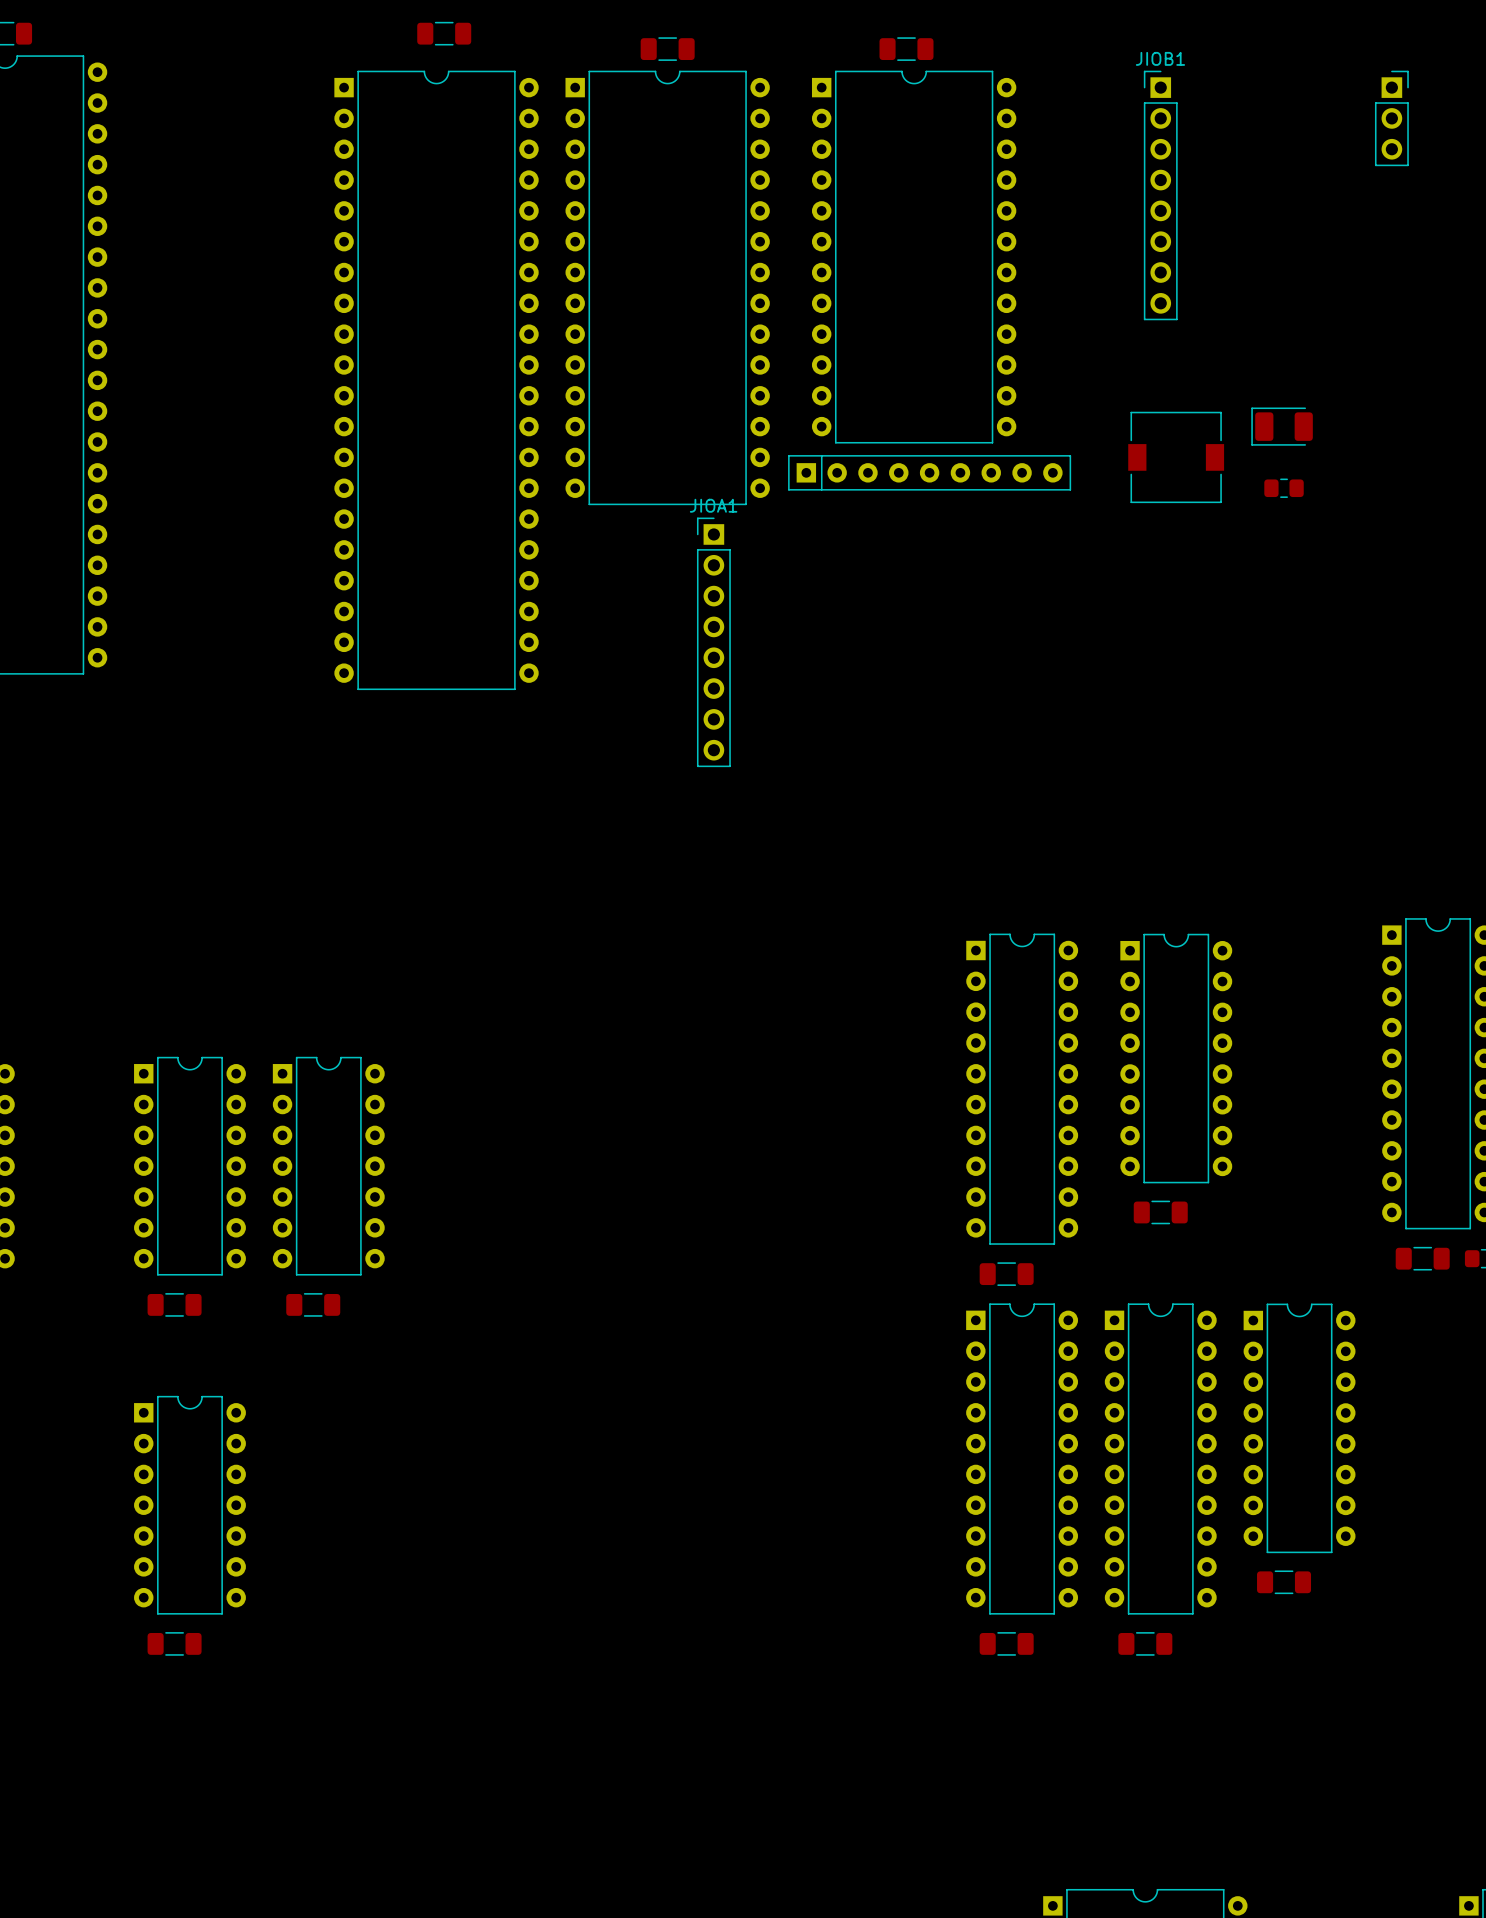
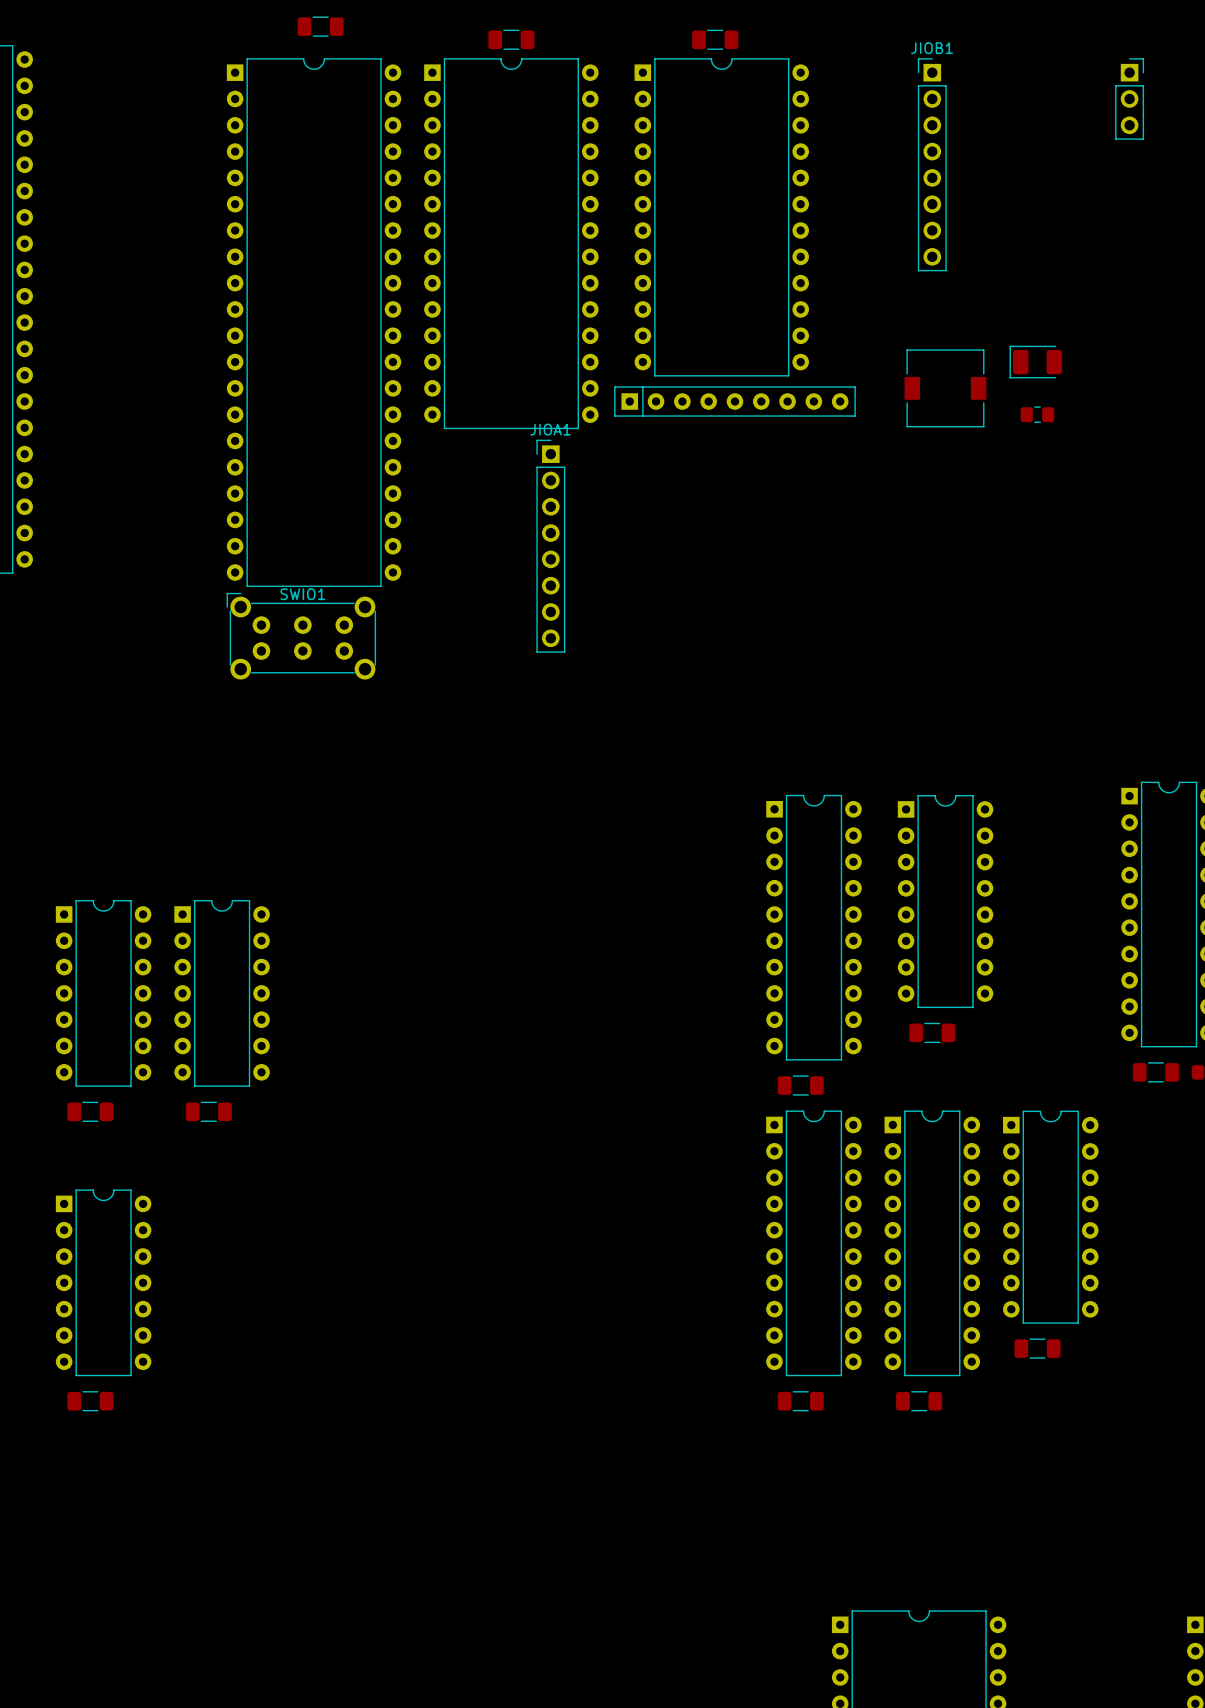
SWIO1: none -> (301, 636)

